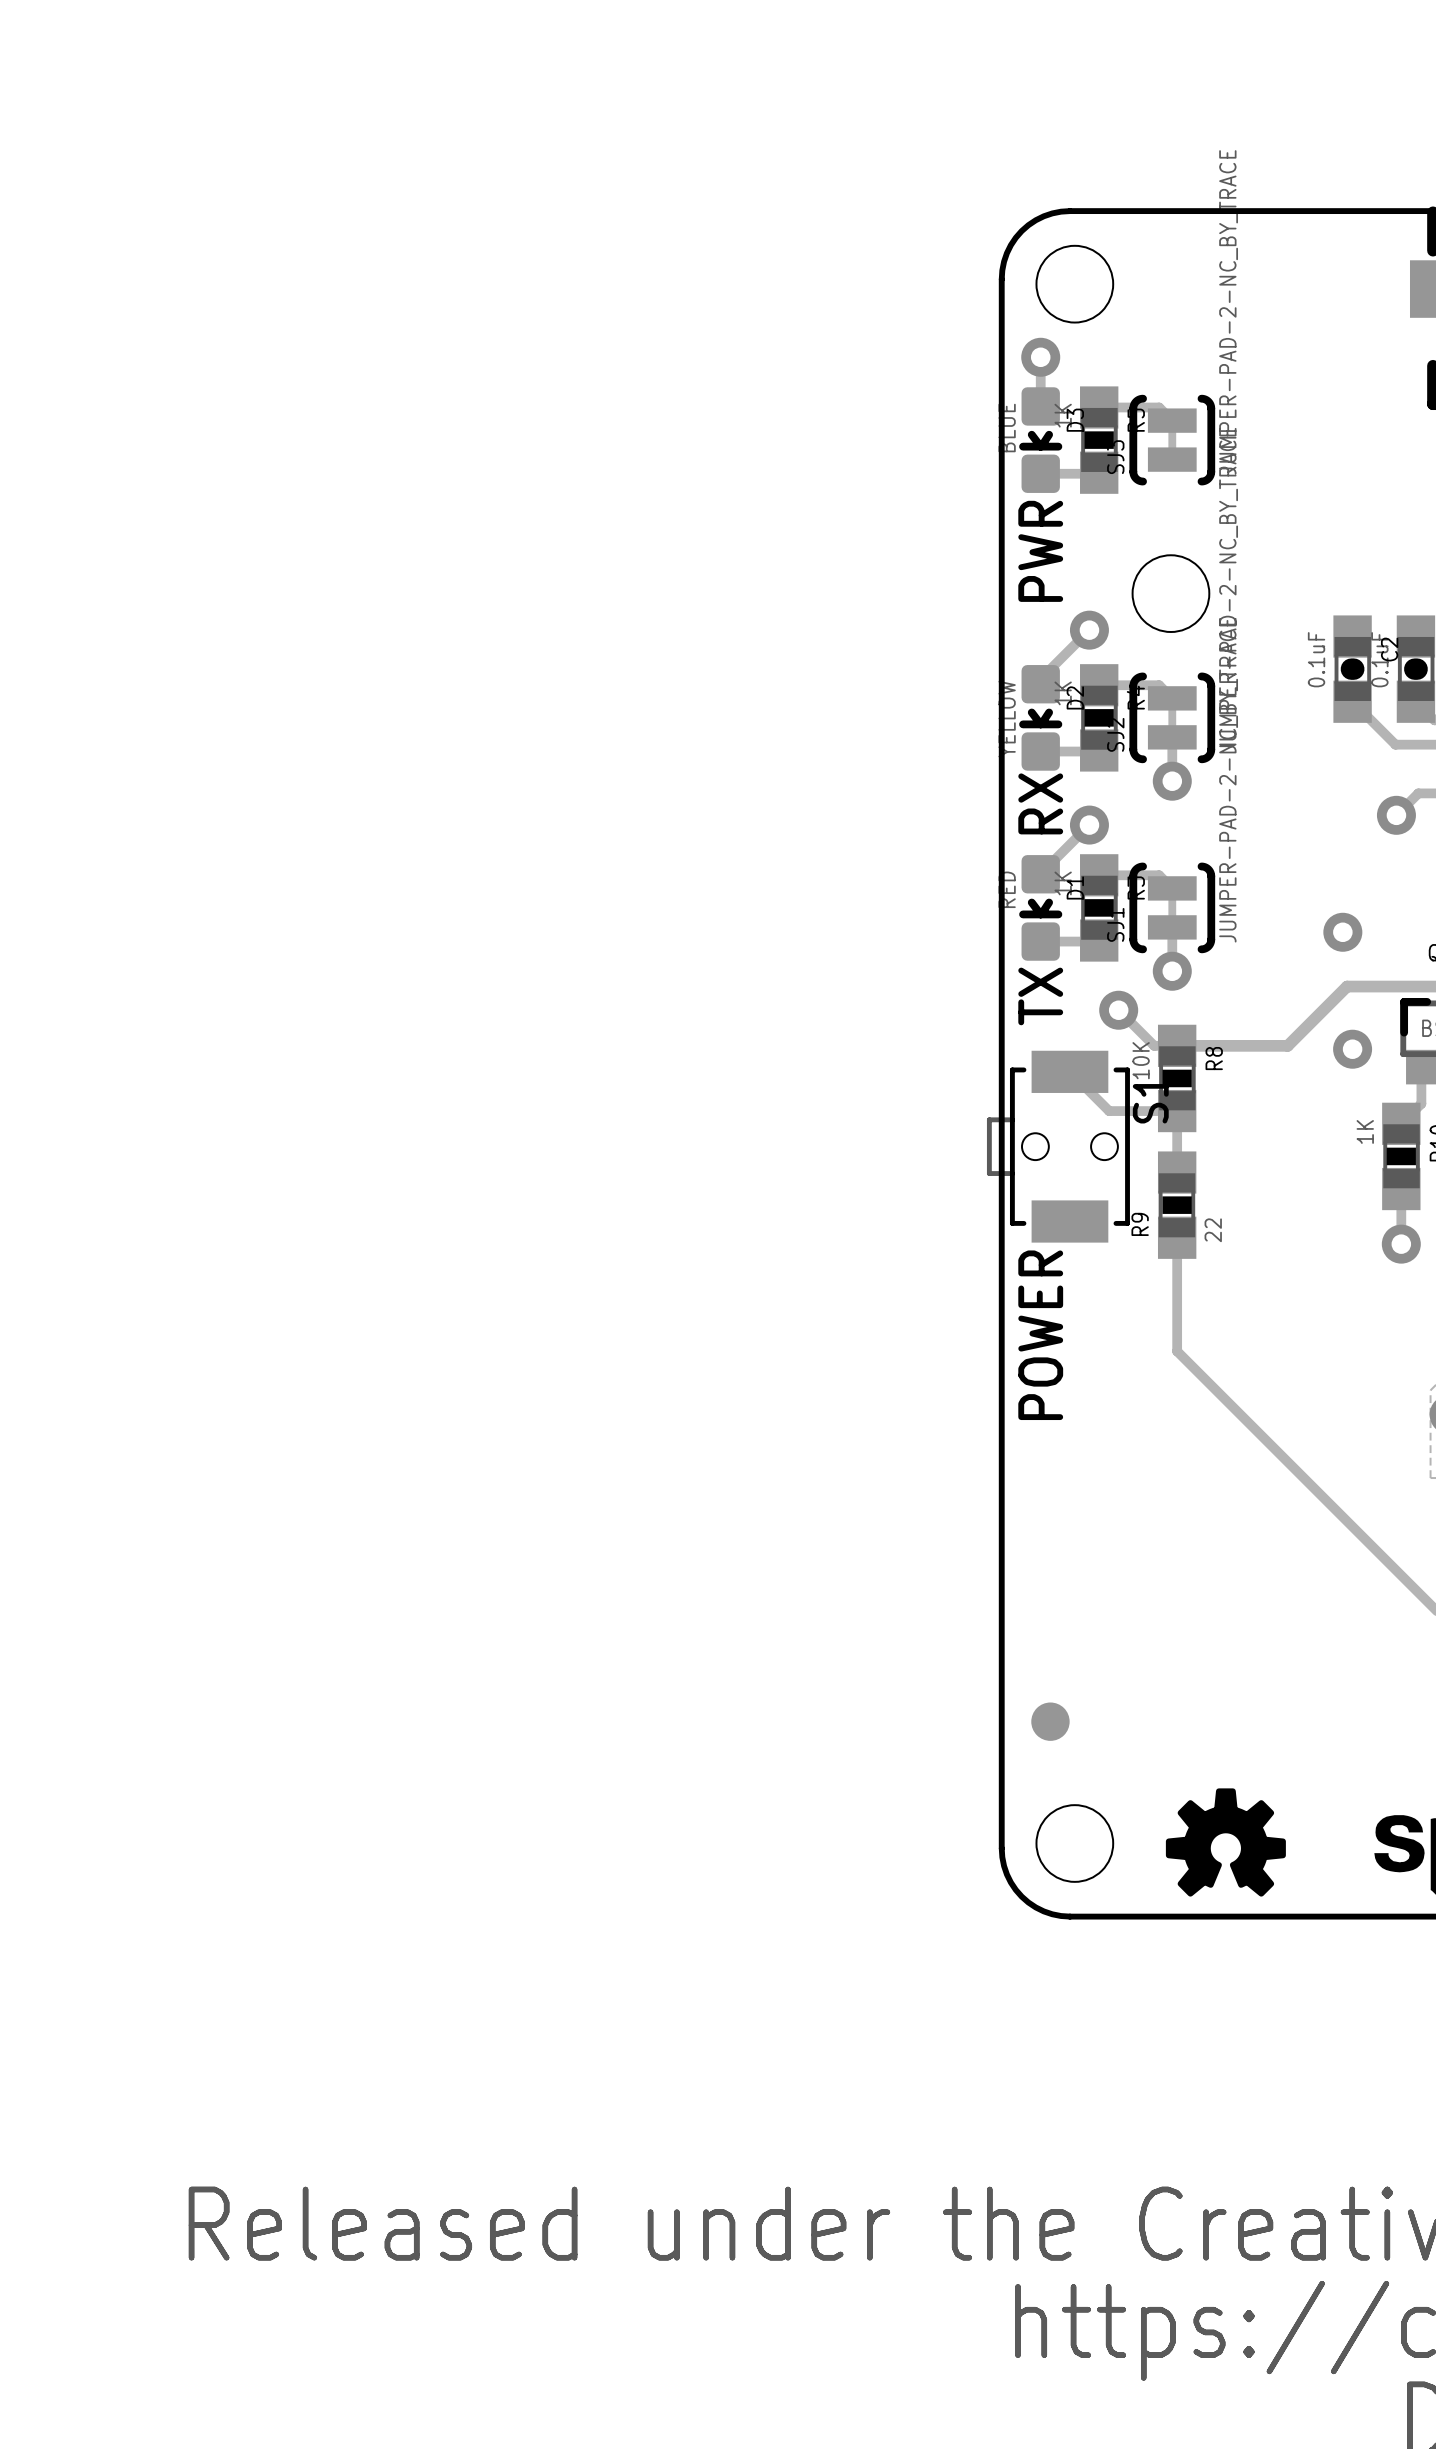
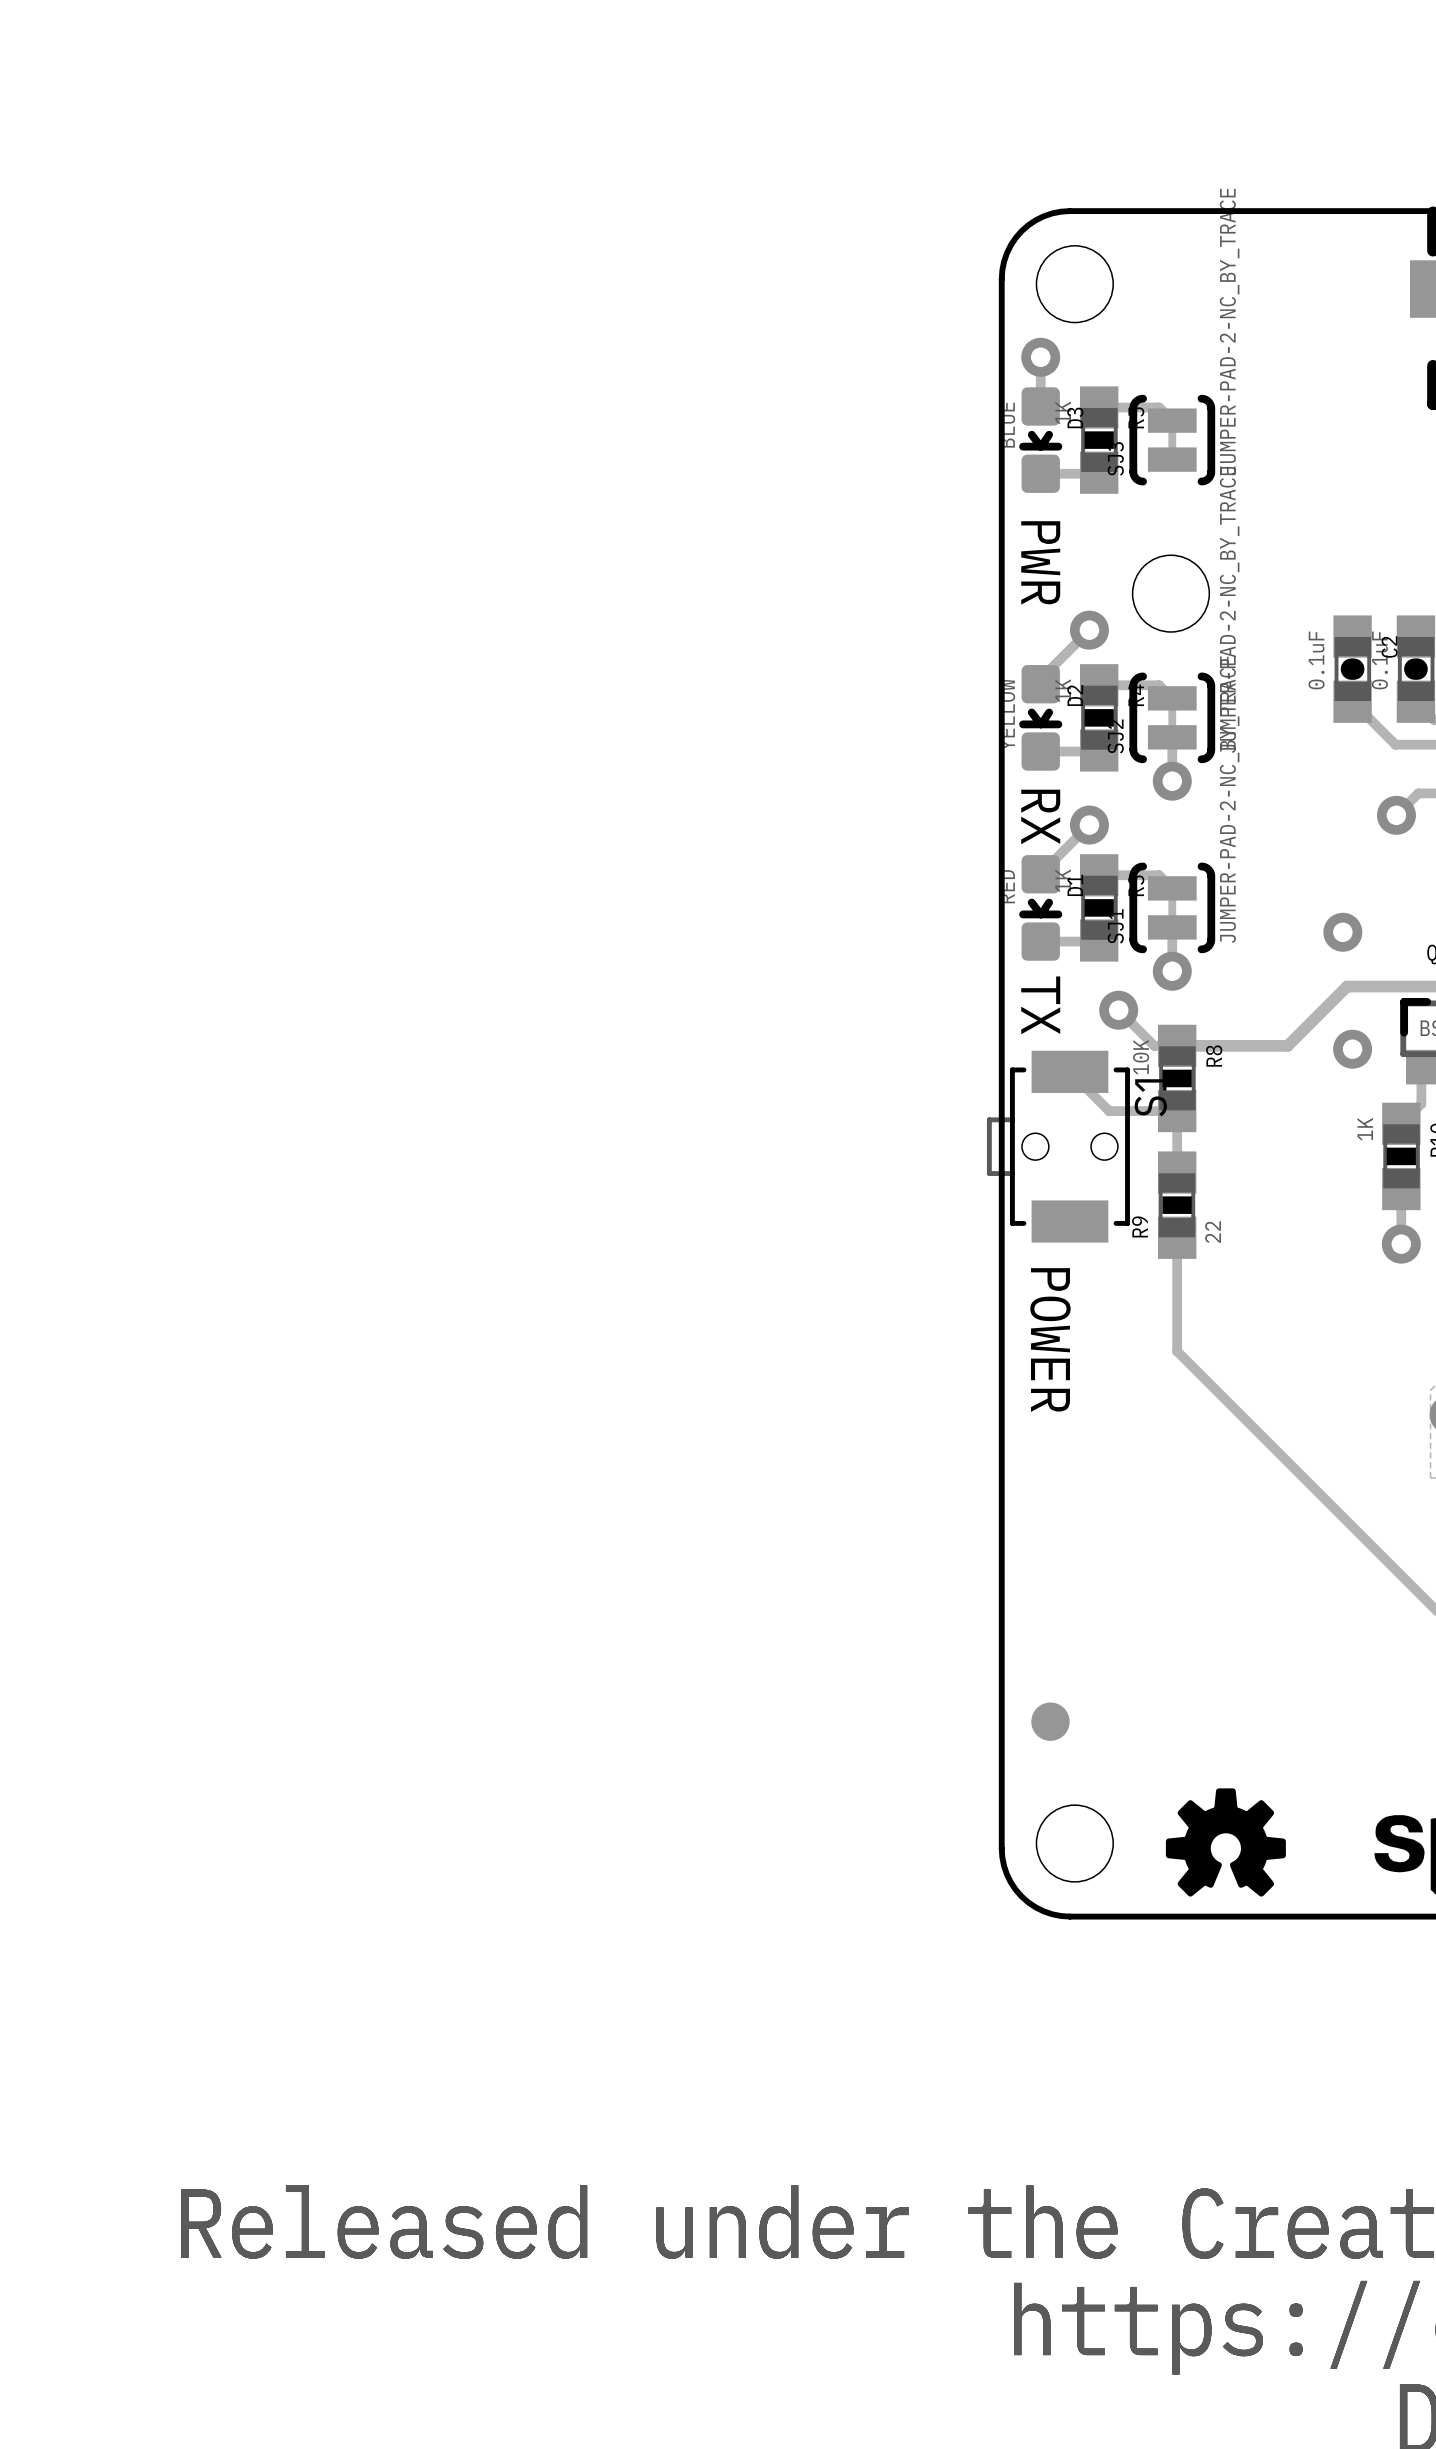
text rotation: 0° (1040, 551) -> 180° (1040, 562)
text rotation: 0° (1040, 803) -> 180° (1040, 816)
text rotation: 0° (1040, 996) -> 180° (1040, 1005)
text rotation: 0° (1040, 1335) -> 180° (1050, 1340)

